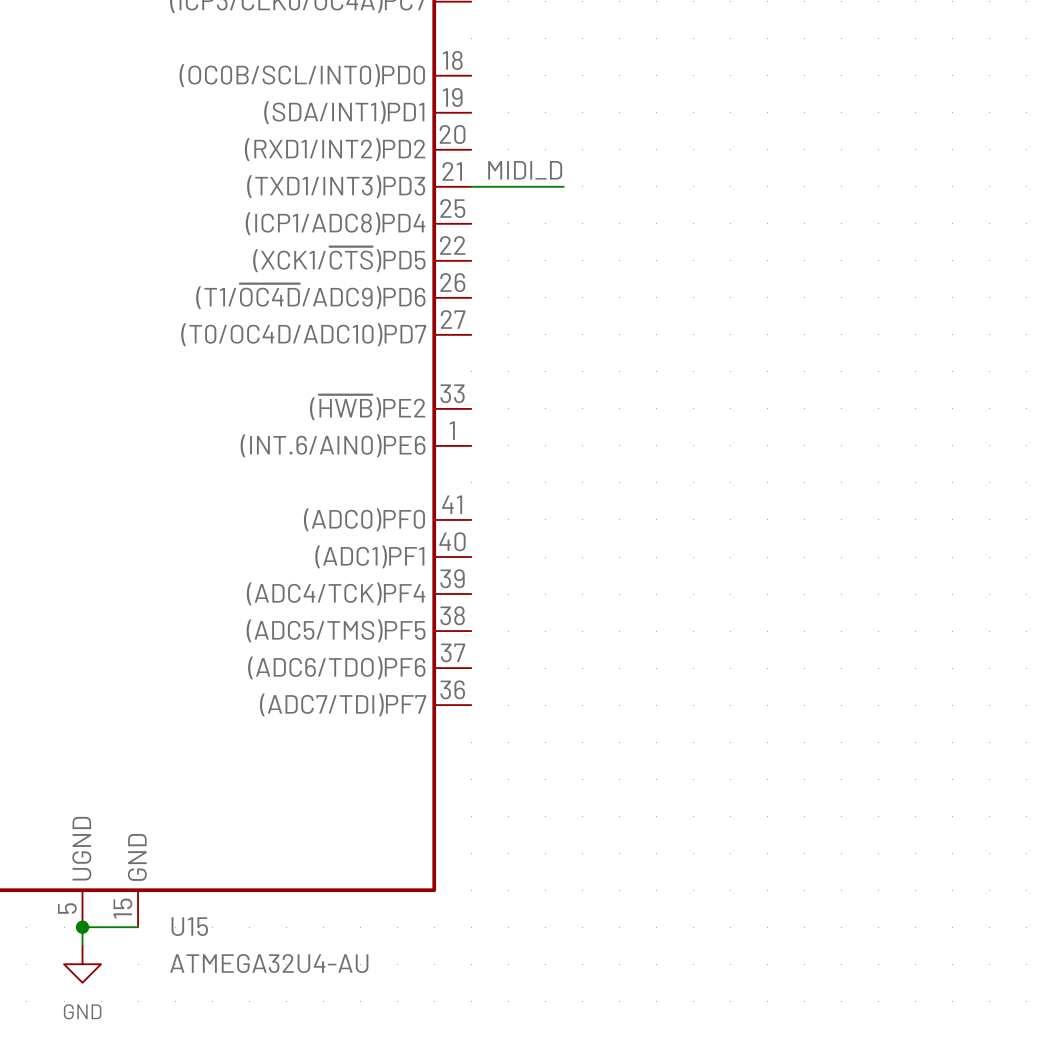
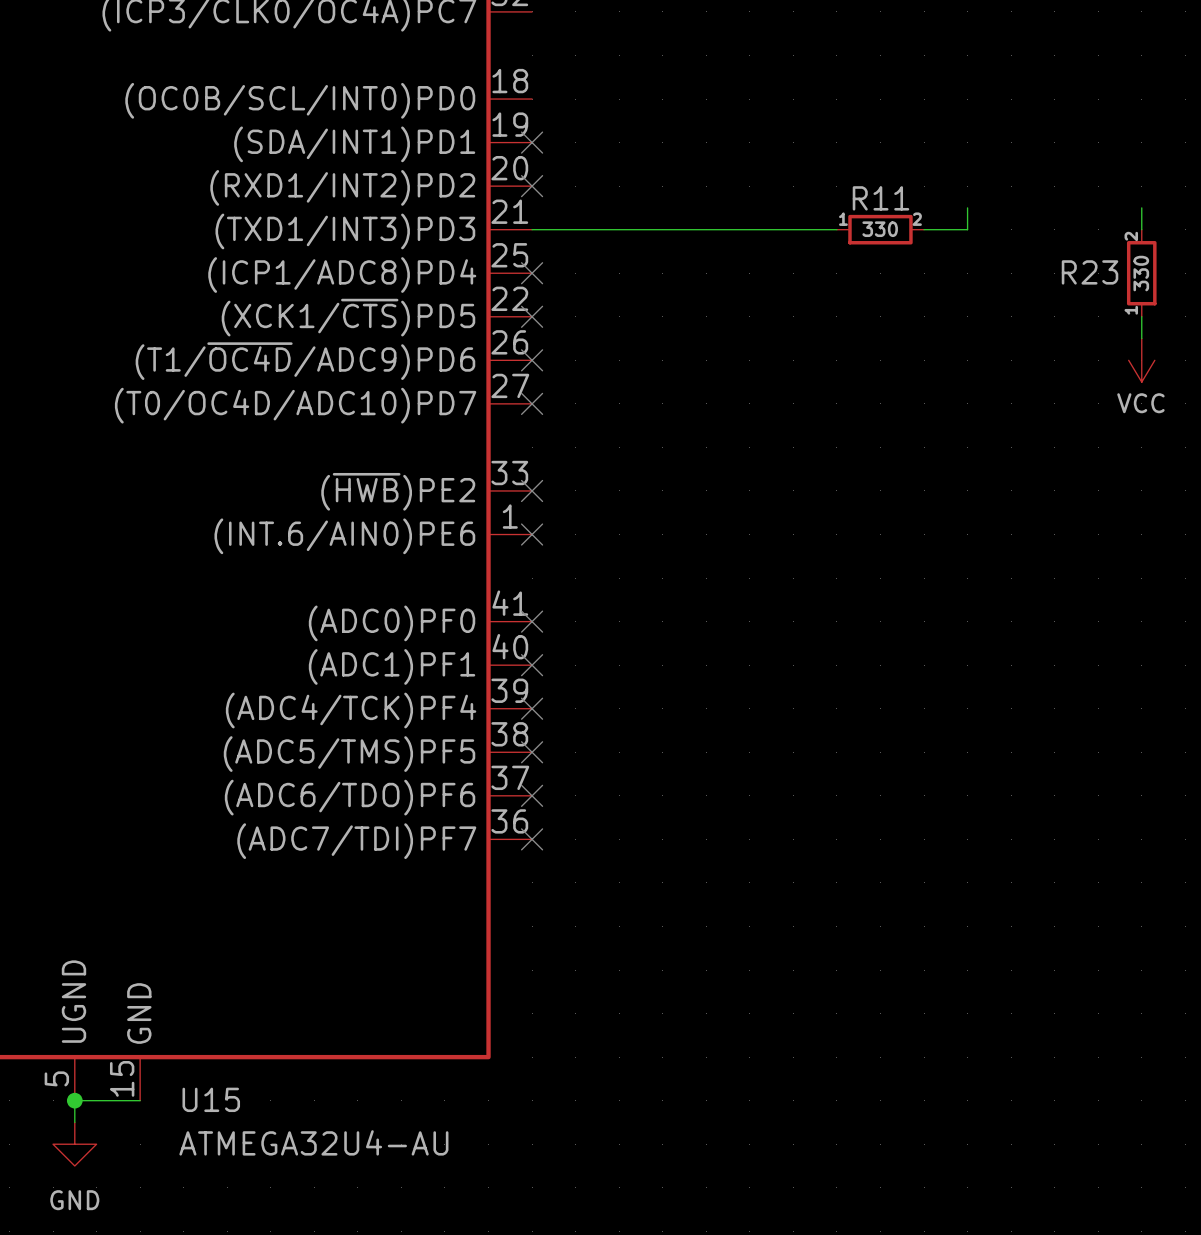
no-connect mark: none -> (532, 142)
no-connect mark: none -> (532, 186)
wire: none -> (967, 207) (967, 229) (924, 229)
wire: none -> (1141, 207) (1141, 229)
label: MIDI_D (525, 170) -> none
wire: none -> (640, 229) (836, 229)
R11: none -> 330 (880, 229)
no-connect mark: none -> (532, 273)
R23: none -> 330 (1141, 273)
no-connect mark: none -> (532, 316)
wire: none -> (1141, 316) (1141, 338)
no-connect mark: none -> (532, 360)
power symbol: none -> VCC (1141, 360)
no-connect mark: none -> (532, 403)
no-connect mark: none -> (532, 490)
no-connect mark: none -> (532, 534)
no-connect mark: none -> (532, 621)
no-connect mark: none -> (532, 665)
no-connect mark: none -> (532, 708)
no-connect mark: none -> (532, 752)
no-connect mark: none -> (532, 795)
no-connect mark: none -> (532, 839)

